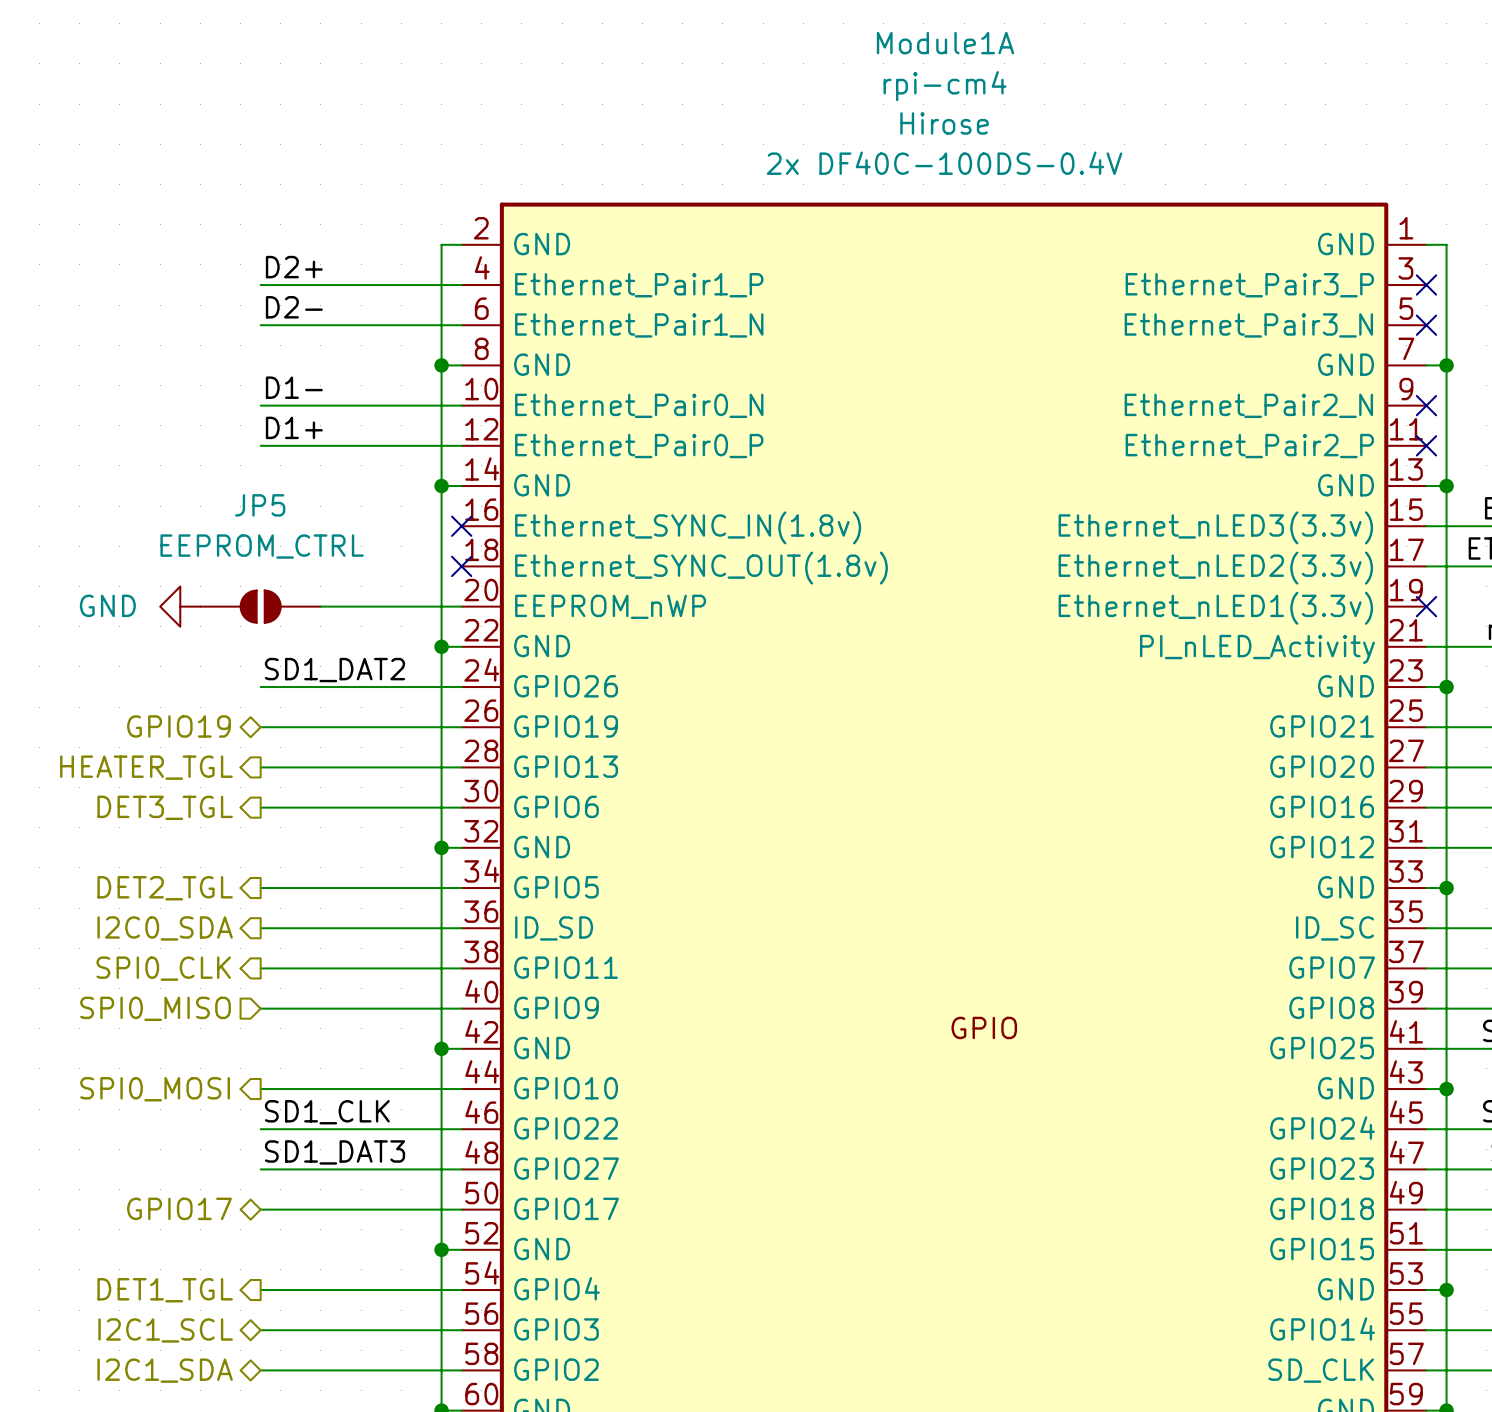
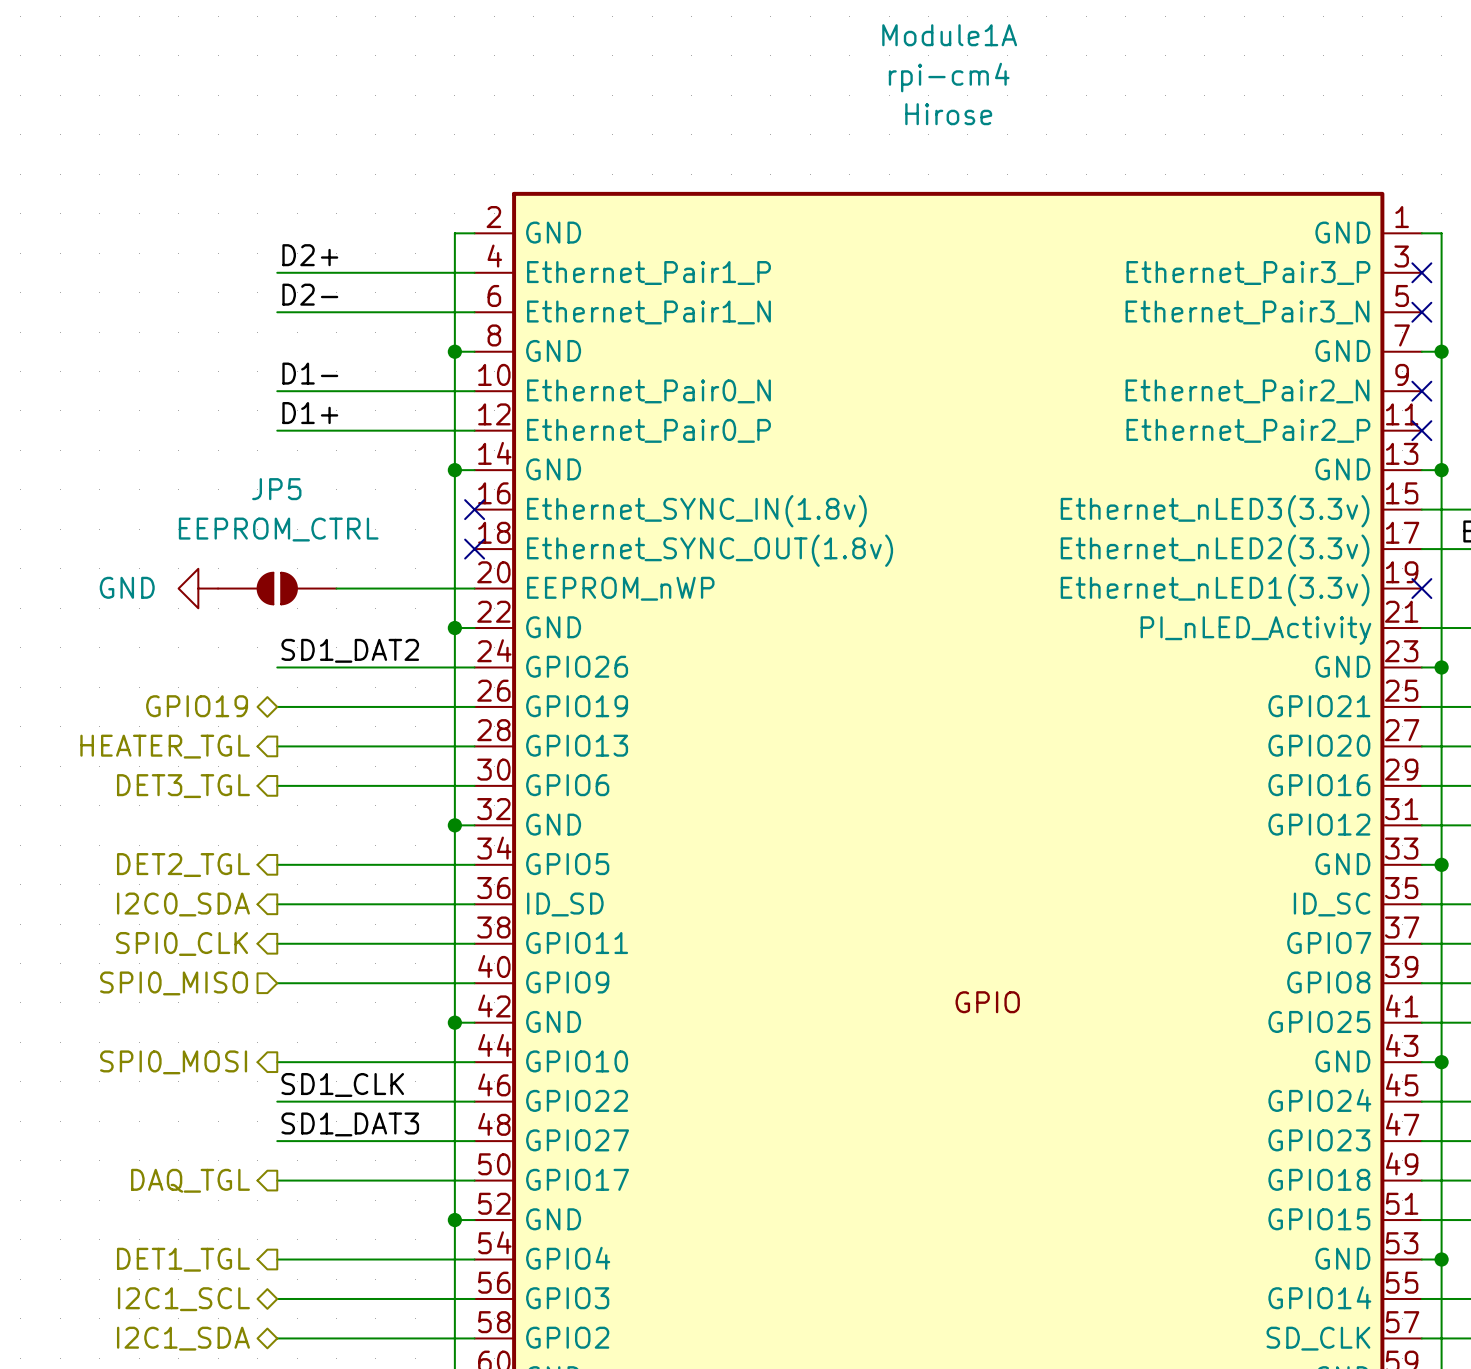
Module1A text: 2x DF40C-100DS-0.4V (944, 163) -> none
hierarchical label shape: bidirectional (179, 1208) -> output (190, 1180)
hierarchical label: GPIO17 (179, 1208) -> DAQ_TGL (190, 1180)

